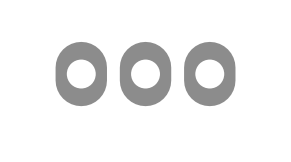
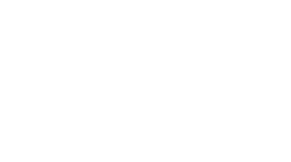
part: (145, 74) -> none

